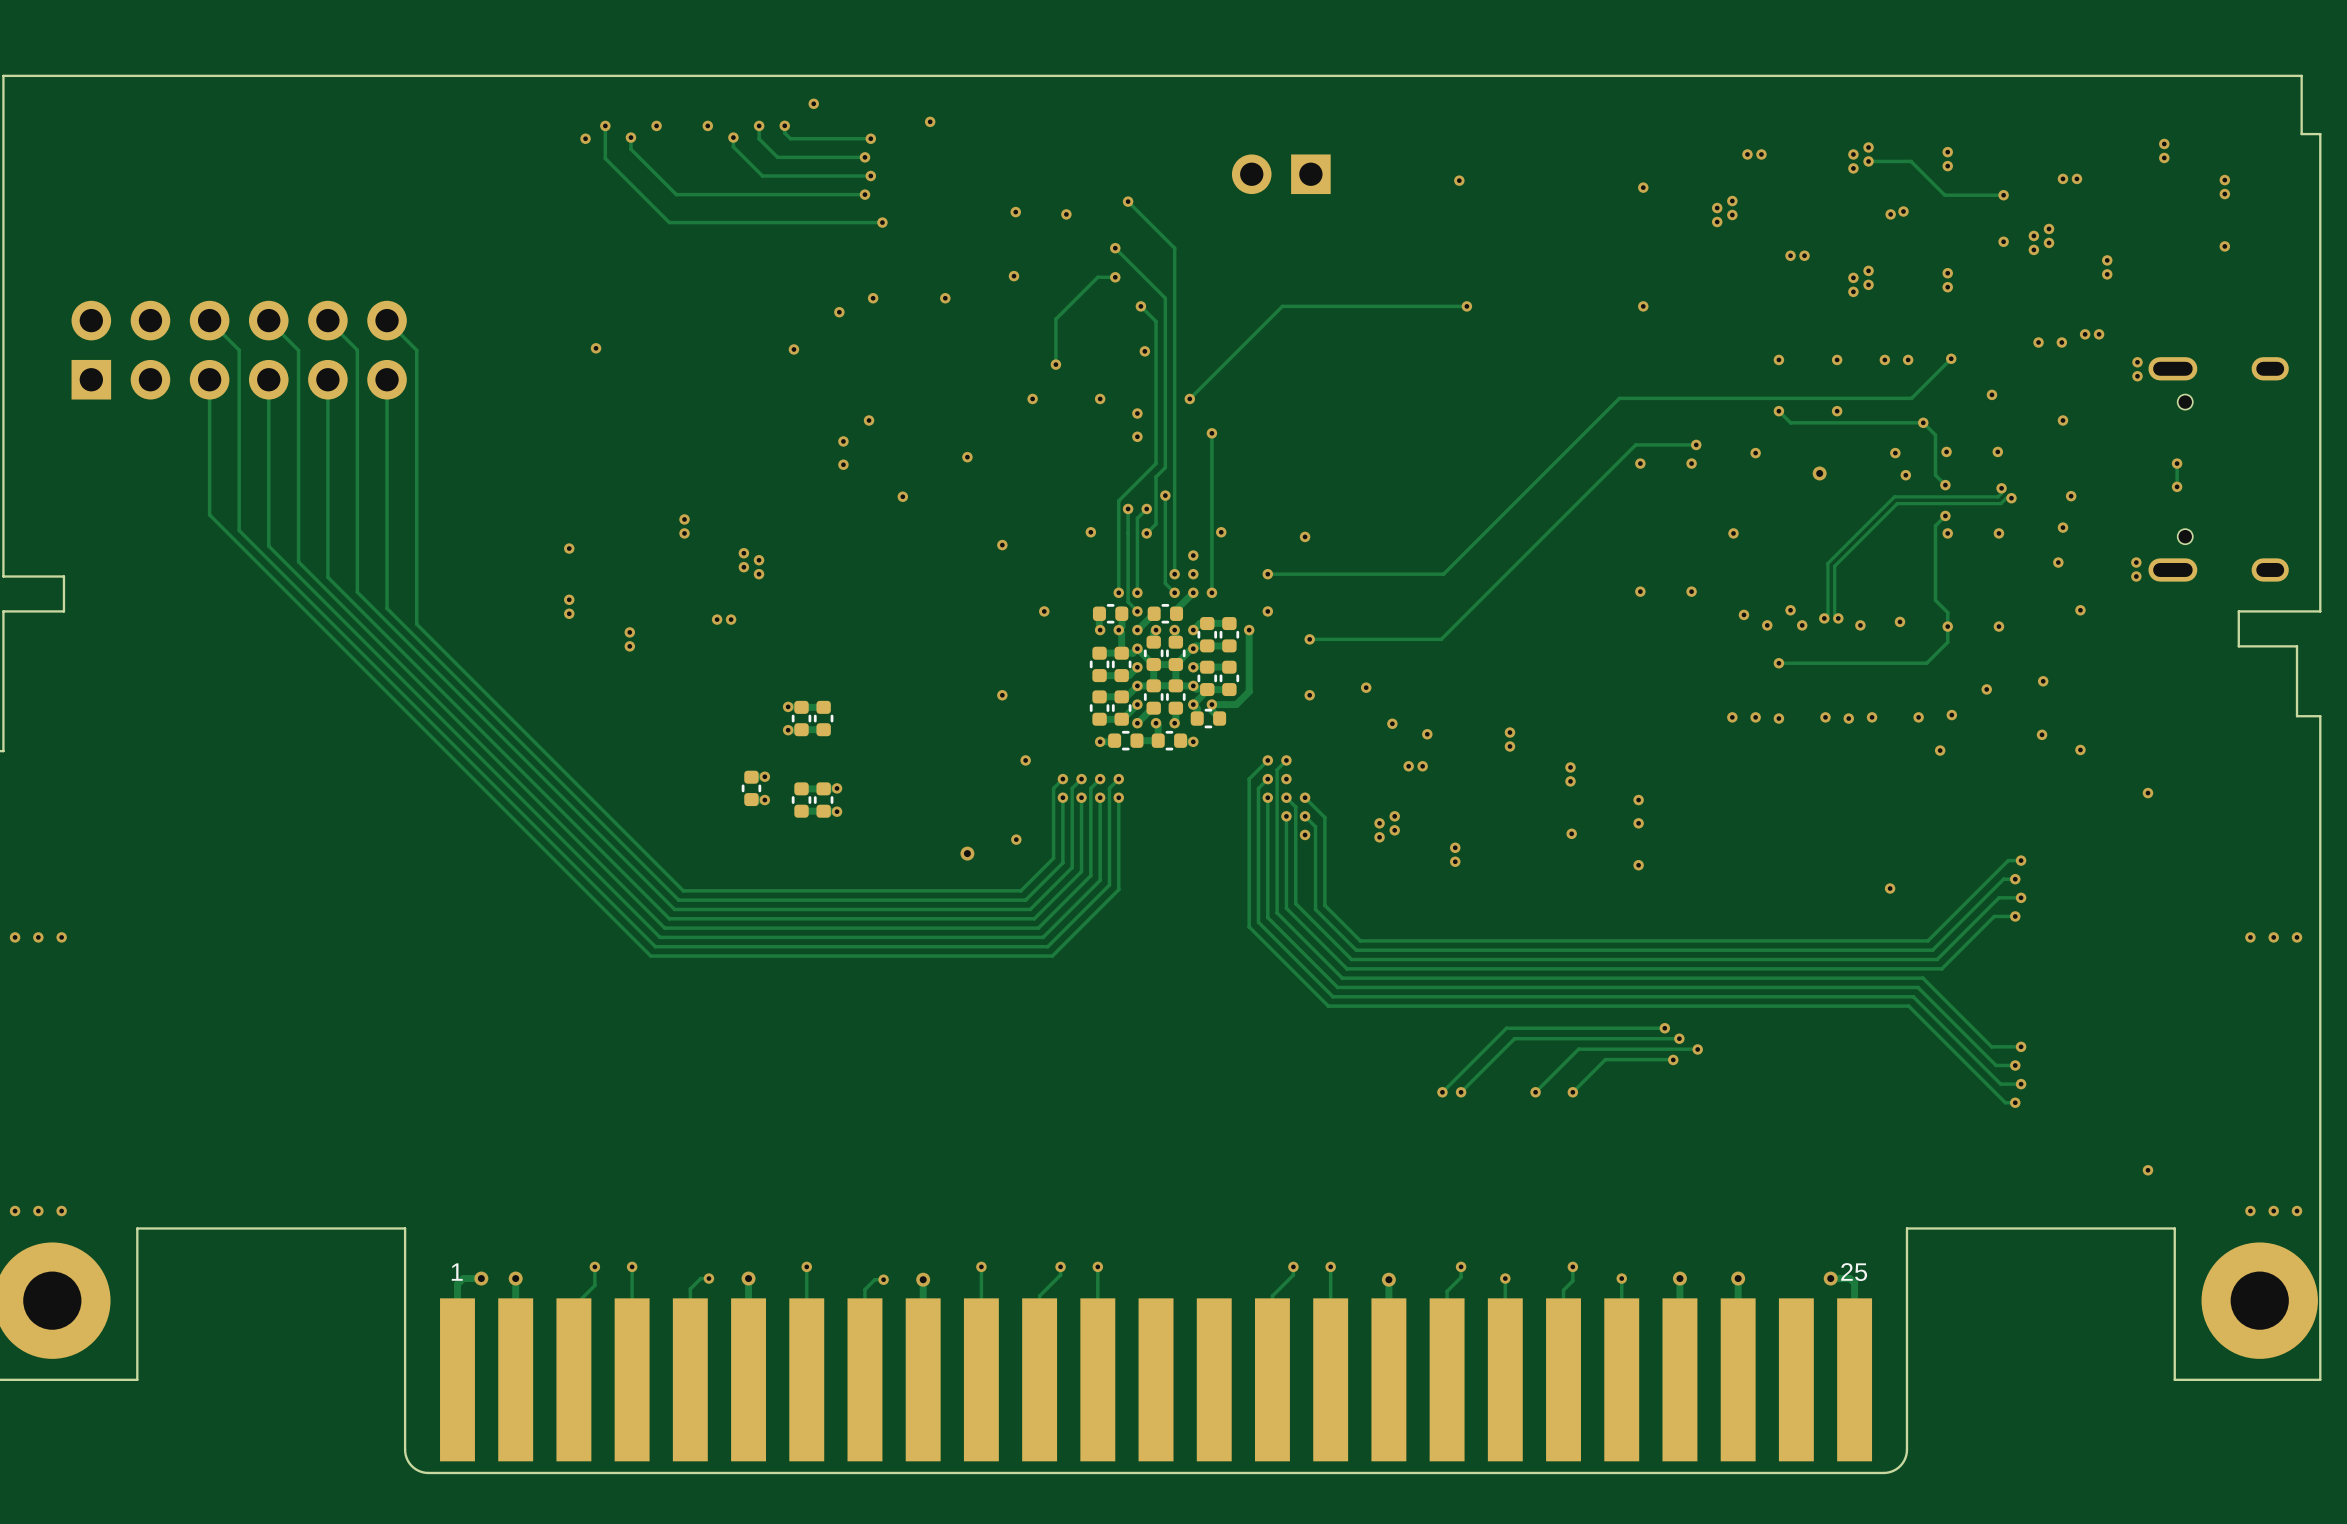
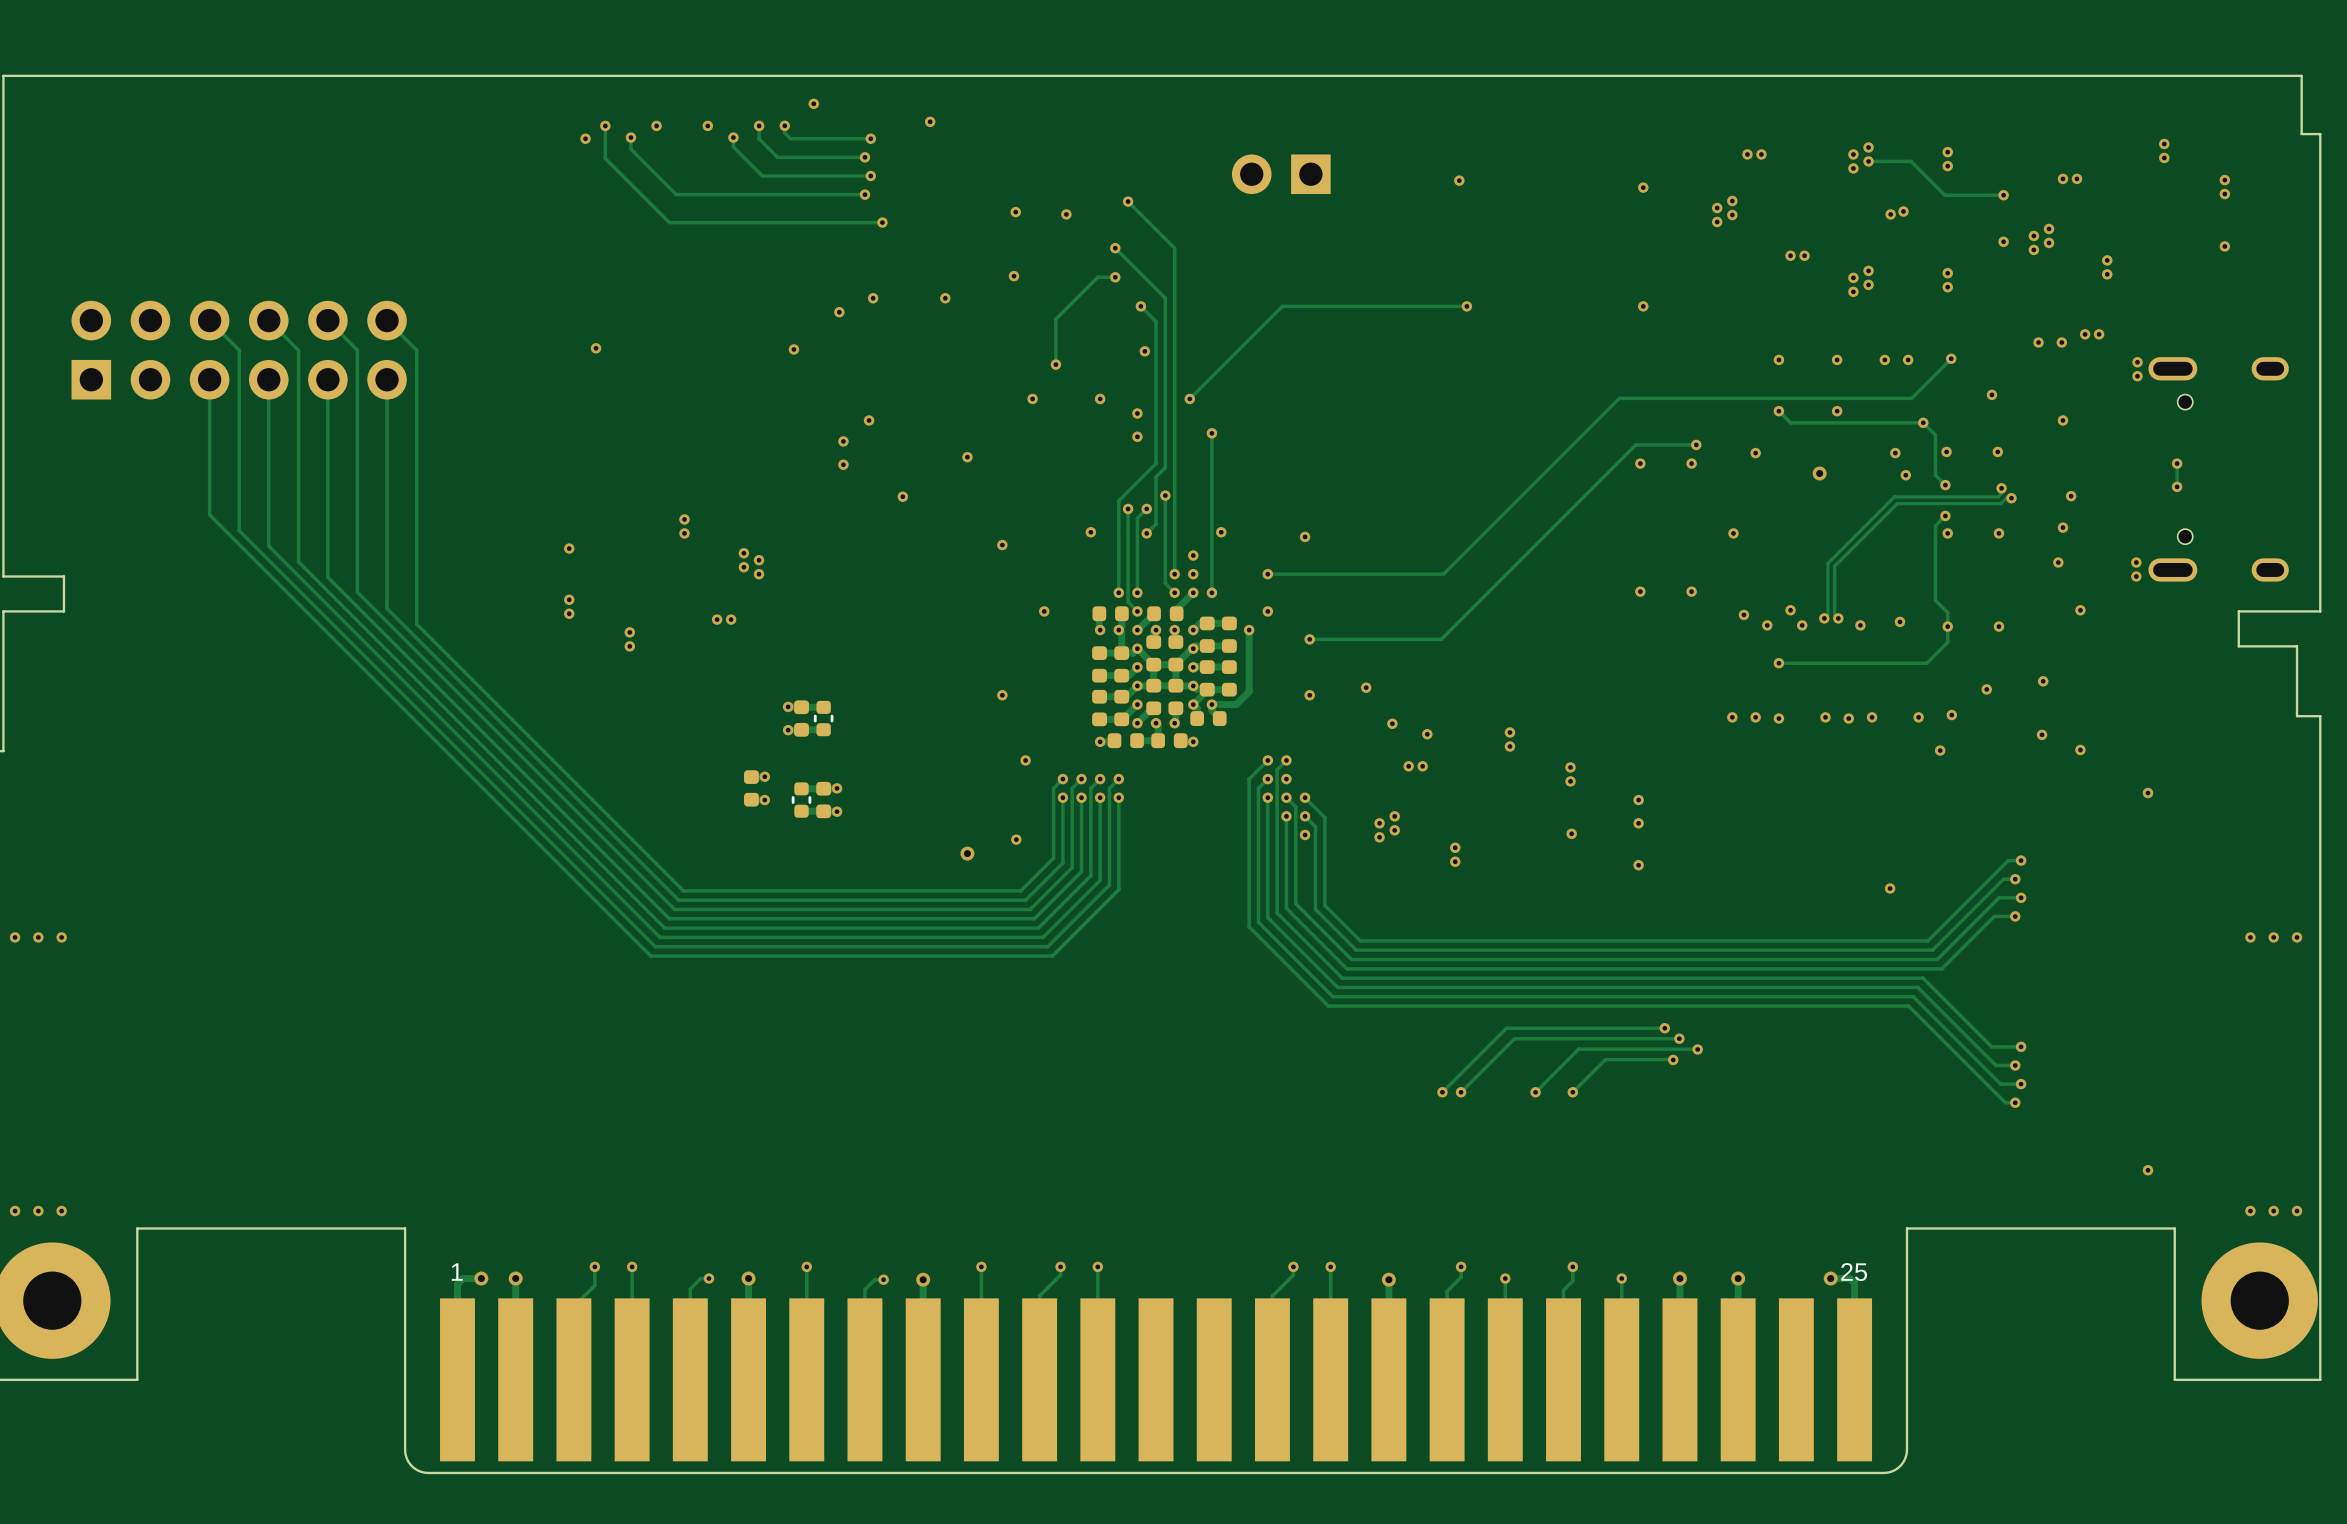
part footprint: [1092, 603, 1129, 624] -> [1092, 606, 1129, 622]
part footprint: [1147, 603, 1184, 624] -> [1147, 606, 1184, 622]
part footprint: [1197, 617, 1218, 653] -> [1199, 616, 1215, 653]
part footprint: [1219, 617, 1240, 653] -> [1221, 616, 1237, 653]
part footprint: [1143, 635, 1164, 672] -> [1146, 635, 1162, 672]
part footprint: [1166, 635, 1186, 672] -> [1168, 635, 1184, 672]
part footprint: [1089, 646, 1110, 683] -> [1092, 646, 1108, 683]
part footprint: [1111, 646, 1132, 683] -> [1114, 646, 1130, 683]
part footprint: [1197, 660, 1218, 697] -> [1199, 660, 1215, 697]
part footprint: [1219, 660, 1240, 697] -> [1221, 660, 1237, 697]
part footprint: [1143, 679, 1164, 715] -> [1146, 678, 1162, 716]
part footprint: [1166, 679, 1186, 715] -> [1168, 678, 1184, 716]
part footprint: [1089, 690, 1110, 726] -> [1092, 689, 1108, 727]
part footprint: [1111, 690, 1132, 726] -> [1114, 689, 1130, 727]
part footprint: [791, 700, 812, 737] -> [794, 700, 809, 737]
part footprint: [1190, 708, 1227, 729] -> [1190, 711, 1227, 726]
part footprint: [1108, 730, 1144, 751] -> [1107, 733, 1144, 749]
part footprint: [1151, 730, 1188, 751] -> [1151, 733, 1188, 749]
part footprint: [741, 770, 762, 807] -> [744, 770, 759, 807]
part footprint: [813, 782, 834, 818] -> [816, 781, 832, 819]

